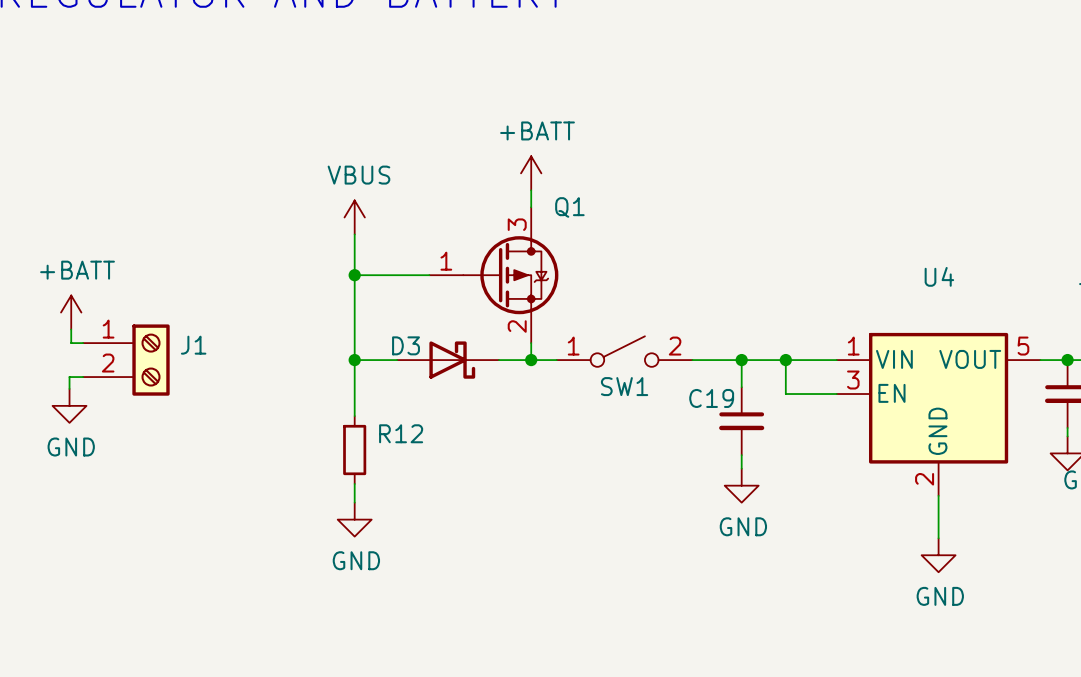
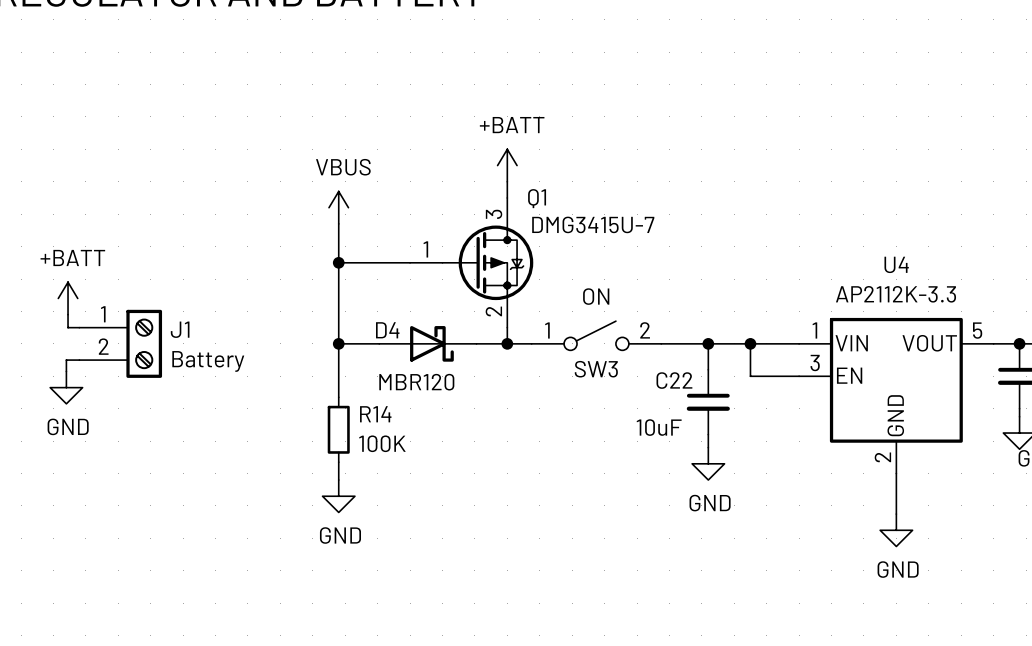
Q1 value: none -> DMG3415U-7 (593, 224)
U4 value: none -> AP2112K-3.3 (895, 294)
SW1 value: none -> ON (596, 296)
D3 name: D3 (406, 345) -> D4 (387, 330)
J1 value: none -> Battery (208, 361)
SW1 name: SW1 (624, 386) -> SW3 (596, 369)
C19 name: C19 (711, 398) -> C22 (674, 380)
D3 value: none -> MBR120 (416, 382)
R12 name: R12 (401, 433) -> R14 (375, 414)
C19 value: none -> 10uF (659, 427)
R12 value: none -> 100K (382, 443)

